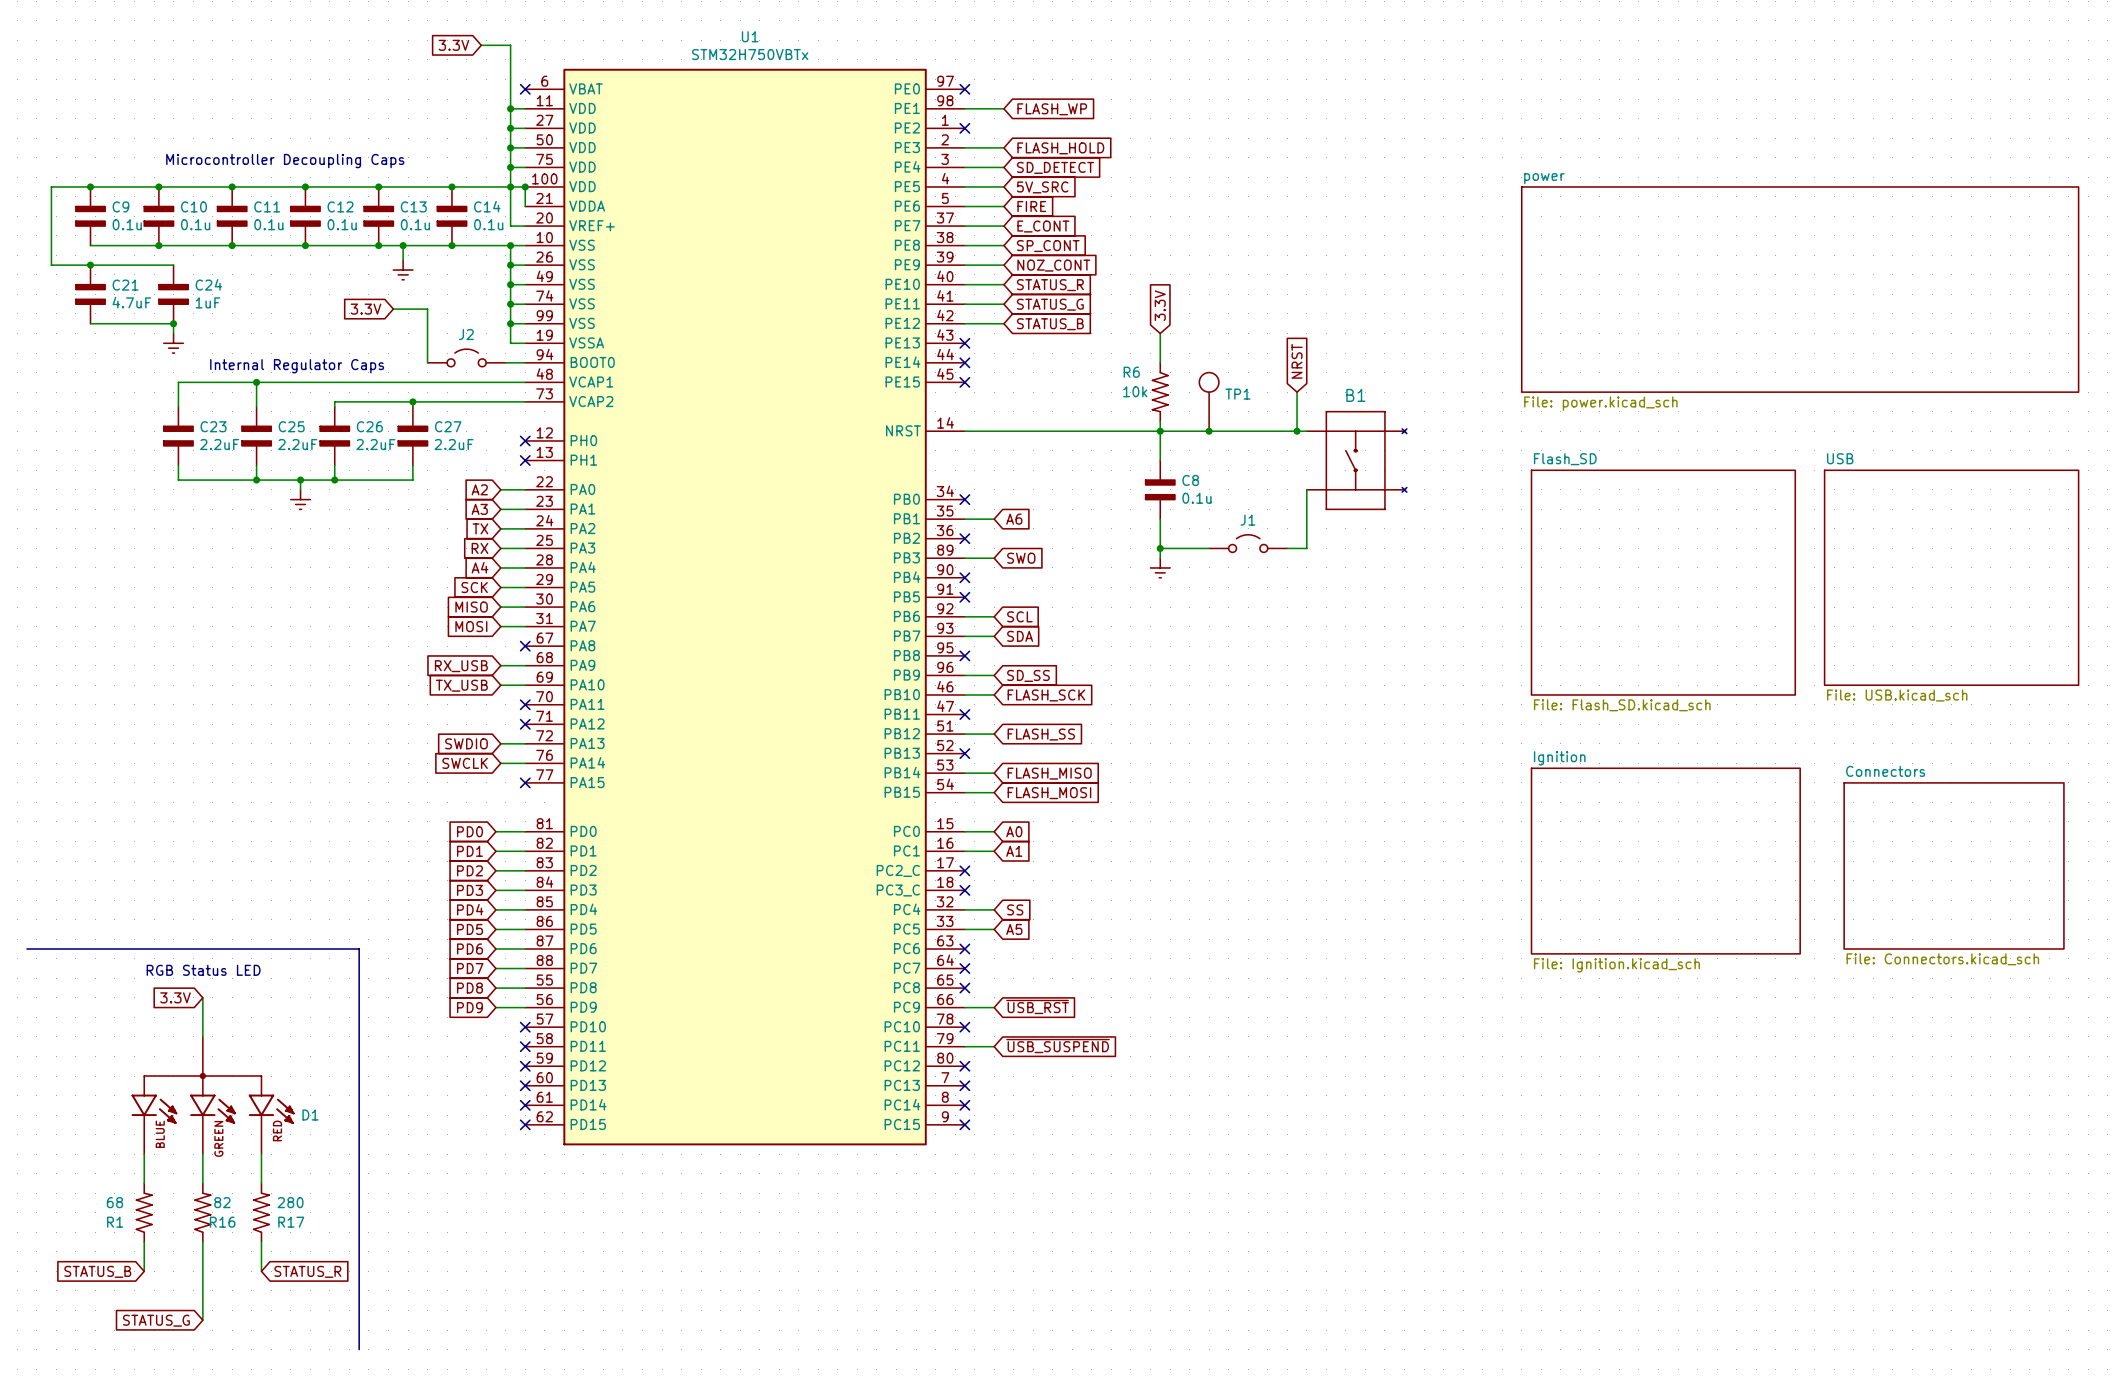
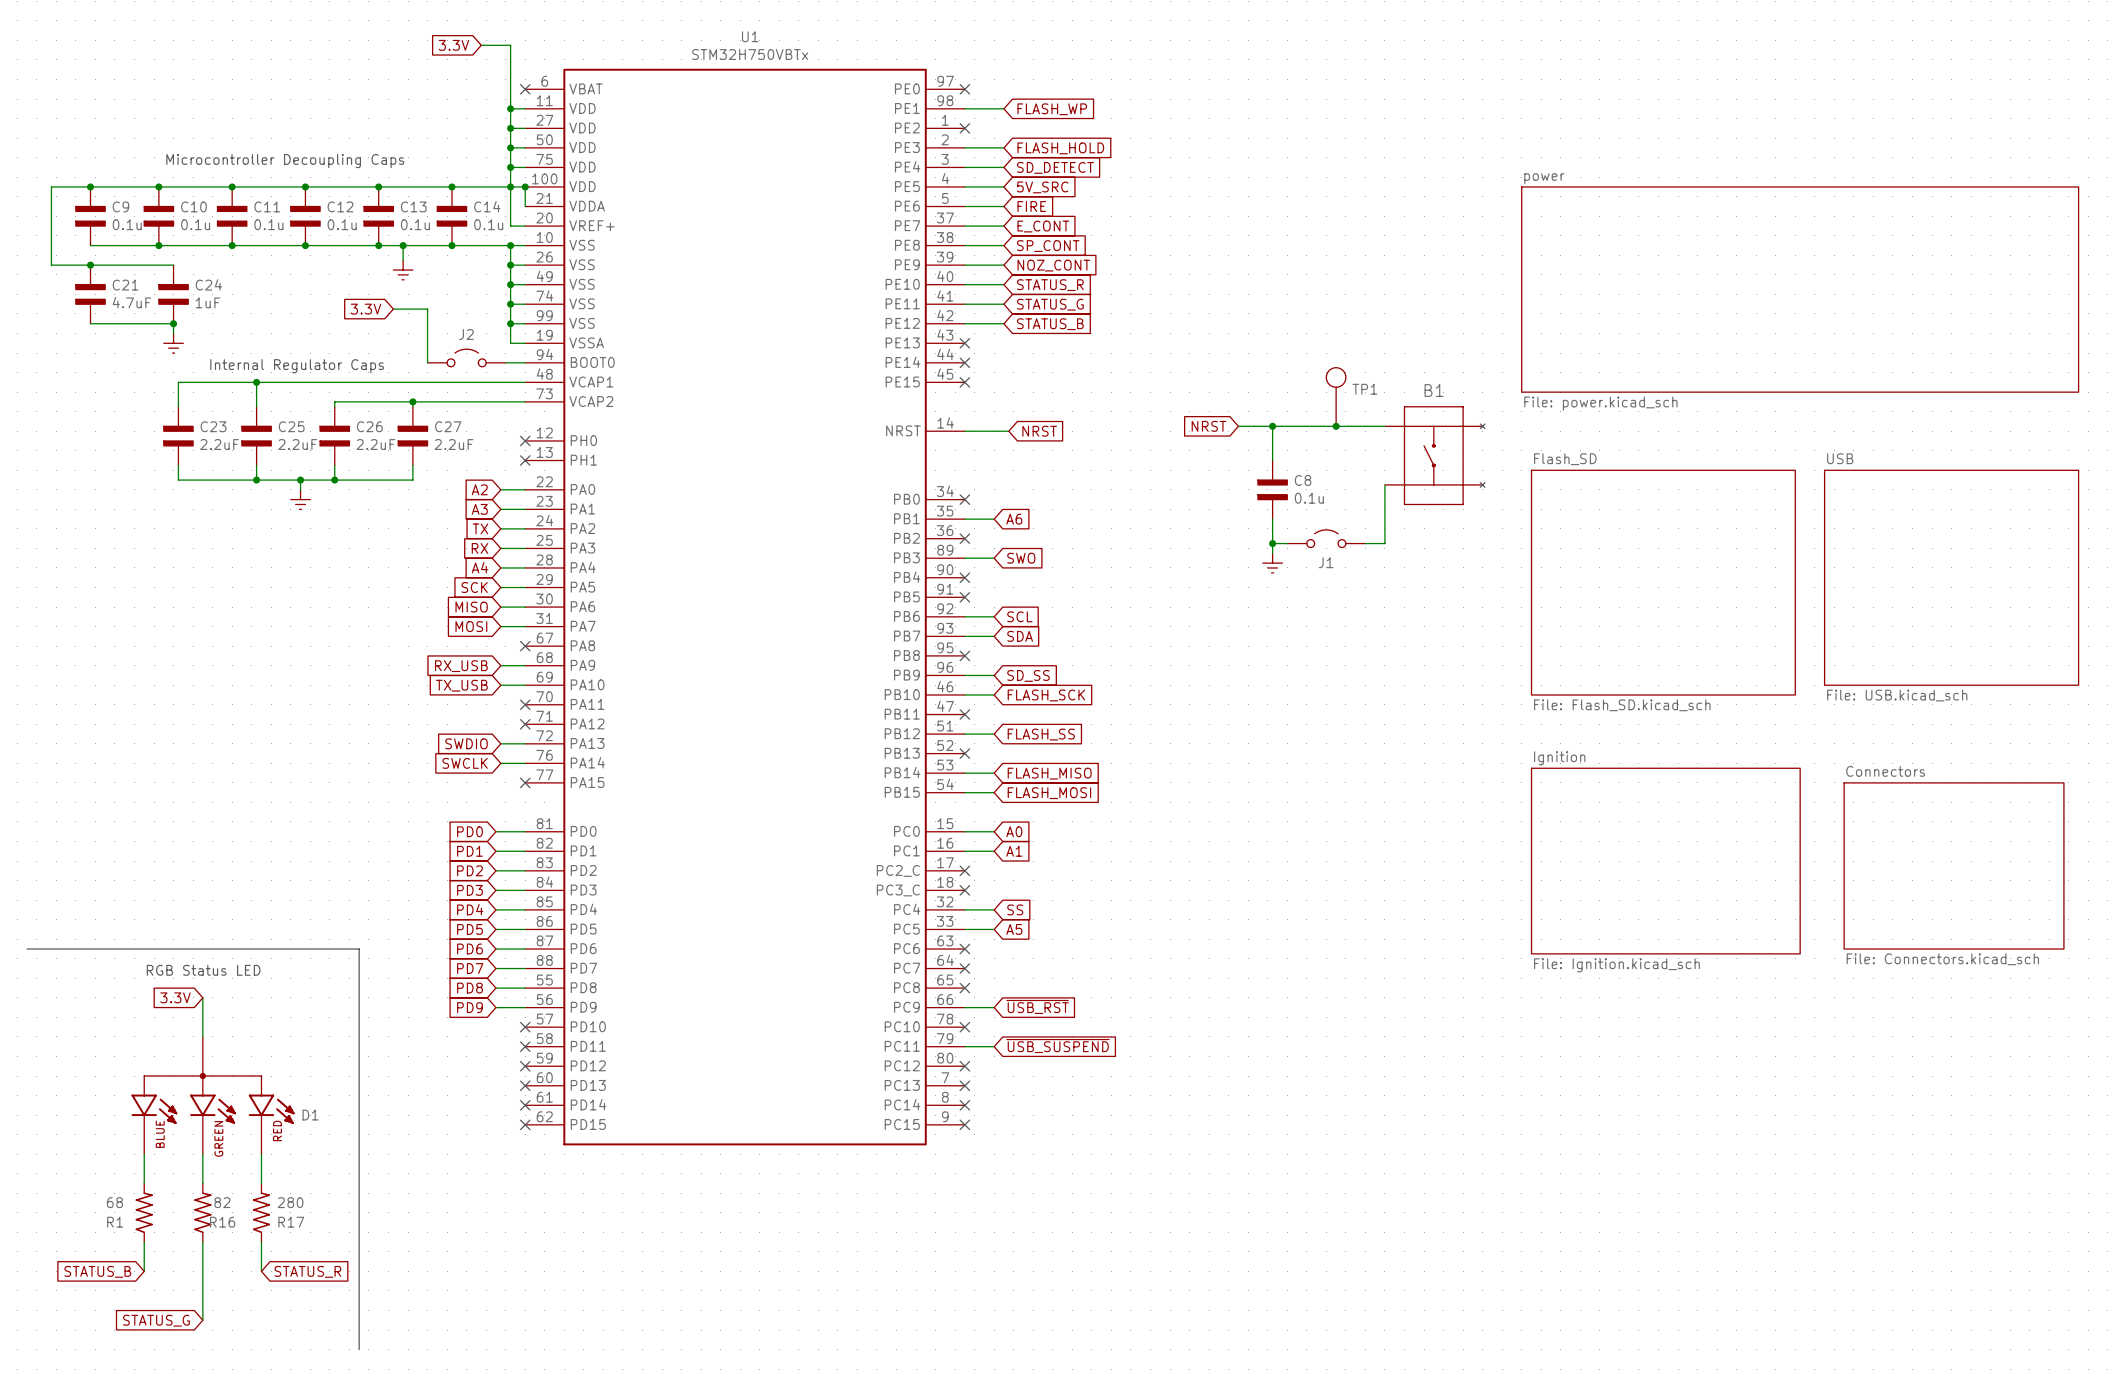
global label: 3.3V (1160, 305) -> none
wire: (1160, 333) (1160, 362) -> none
global label rotation: 0° (1297, 361) -> 90° counterclockwise (1208, 426)
global label position: NRST (1297, 361) -> NRST (1208, 426)
R6: 10k (1160, 392) -> none
wire: (1297, 392) (1297, 431) -> none
TP1 position: (1209, 401) -> (1336, 397)
wire: (1160, 421) (1160, 460) -> none
wire: none -> (1238, 426) (1384, 426)
wire: none -> (1272, 426) (1272, 460)
junction: none -> (1272, 426)
junction: none -> (1336, 426)
wire: (1008, 431) (1306, 431) -> none
global label: none -> NRST (1039, 431)
junction: (1160, 431) -> none
junction: (1209, 431) -> none
junction: (1297, 431) -> none
B1 position: (1356, 460) -> (1434, 455)
C8 position: (1160, 489) -> (1272, 489)
wire: (1306, 489) (1306, 548) (1287, 548) -> (1384, 484) (1384, 543) (1365, 543)
wire: (1160, 519) (1160, 558) -> none
wire: none -> (1272, 519) (1272, 553)
J1 name position: J1 (1247, 520) -> J1 (1326, 562)
J1 position: (1248, 543) -> (1326, 538)
wire: none -> (1272, 543) (1287, 543)
junction: none -> (1272, 543)
wire: (1160, 548) (1209, 548) -> none
junction: (1160, 548) -> none
power symbol position: (1160, 567) -> (1272, 563)

